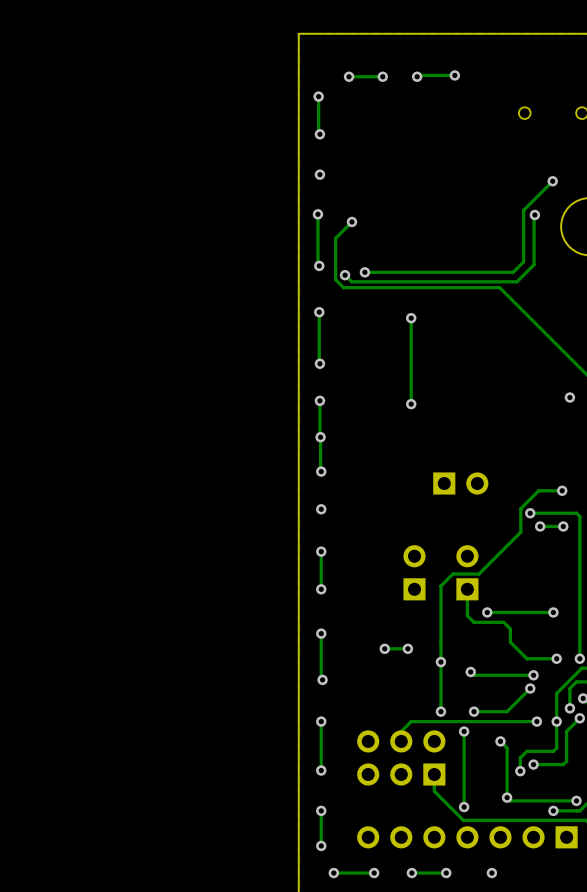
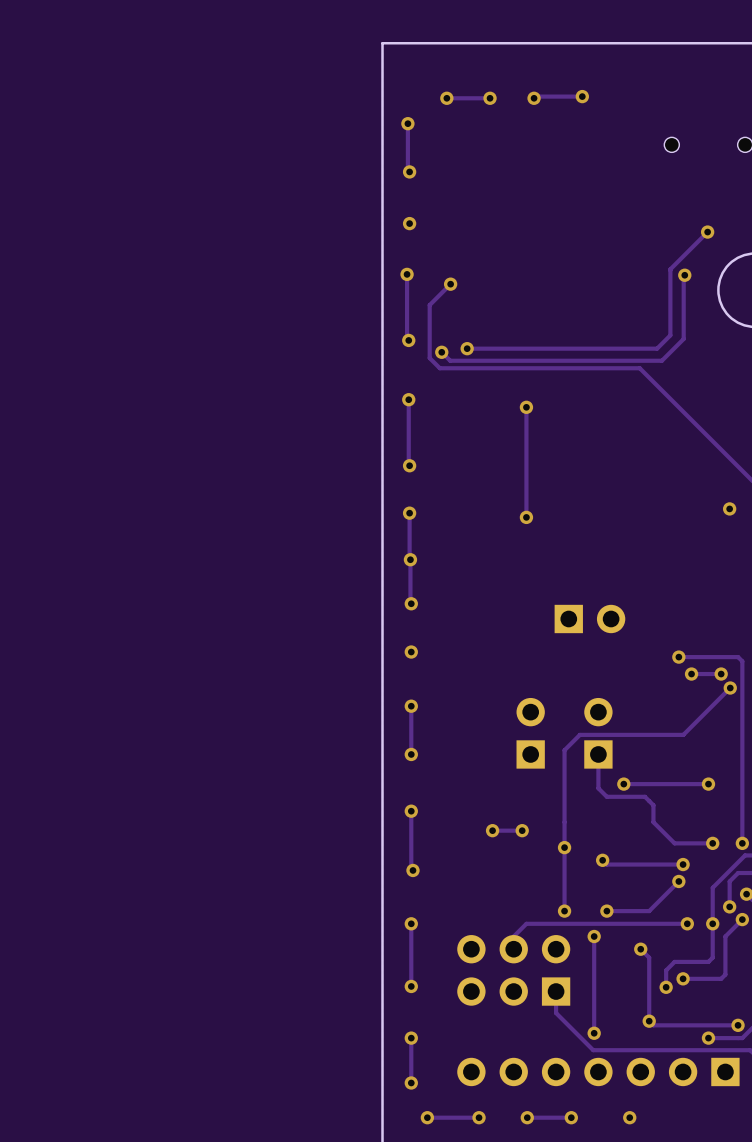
track: (562, 490) (538, 490) (520, 508) (520, 532) (478, 574) -> (730, 688) (683, 734) (613, 734)
via: (562, 490) -> none
via: none -> (730, 688)

